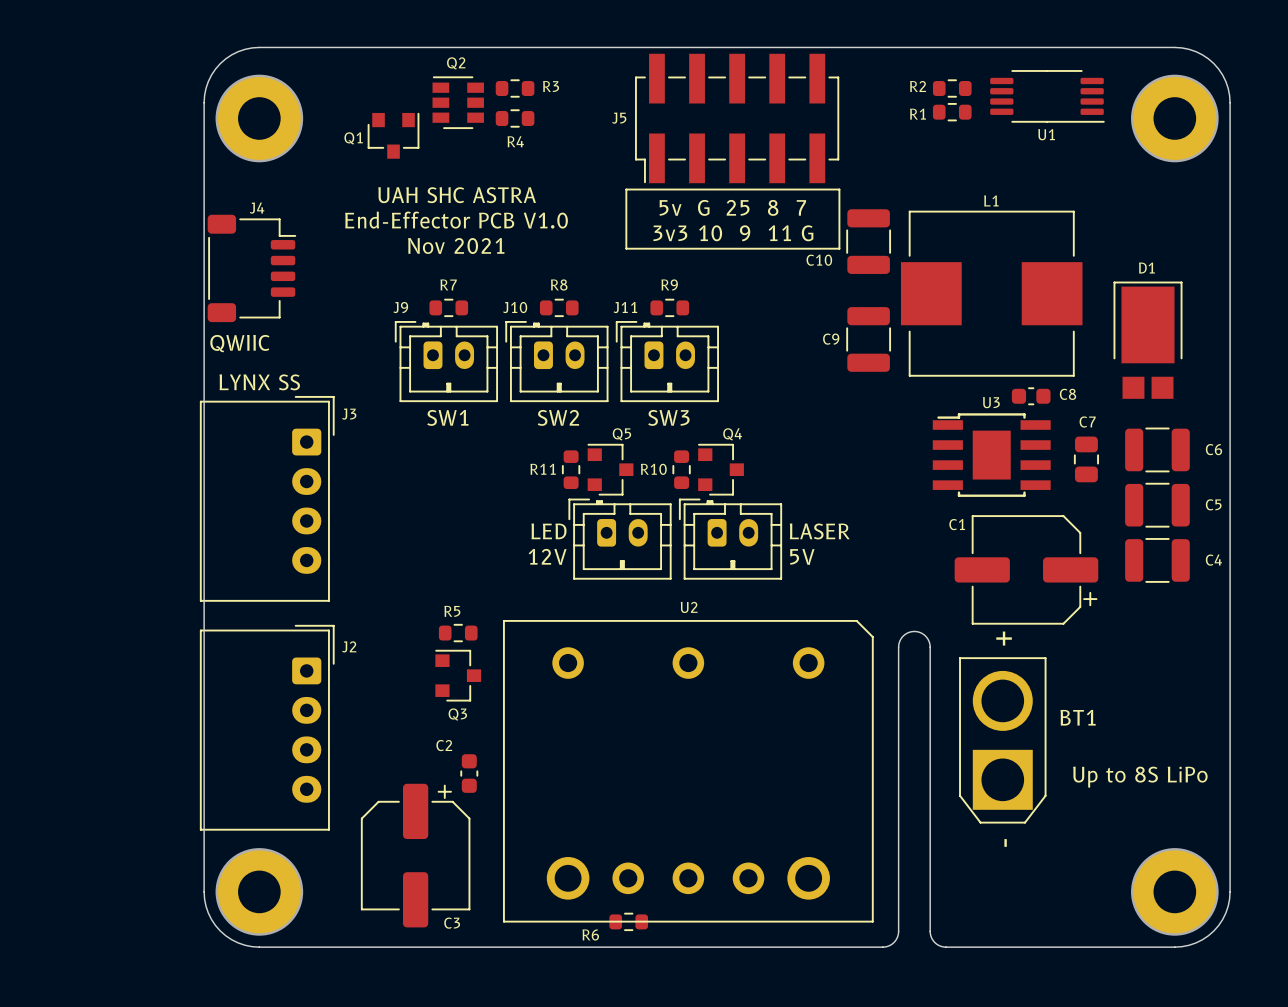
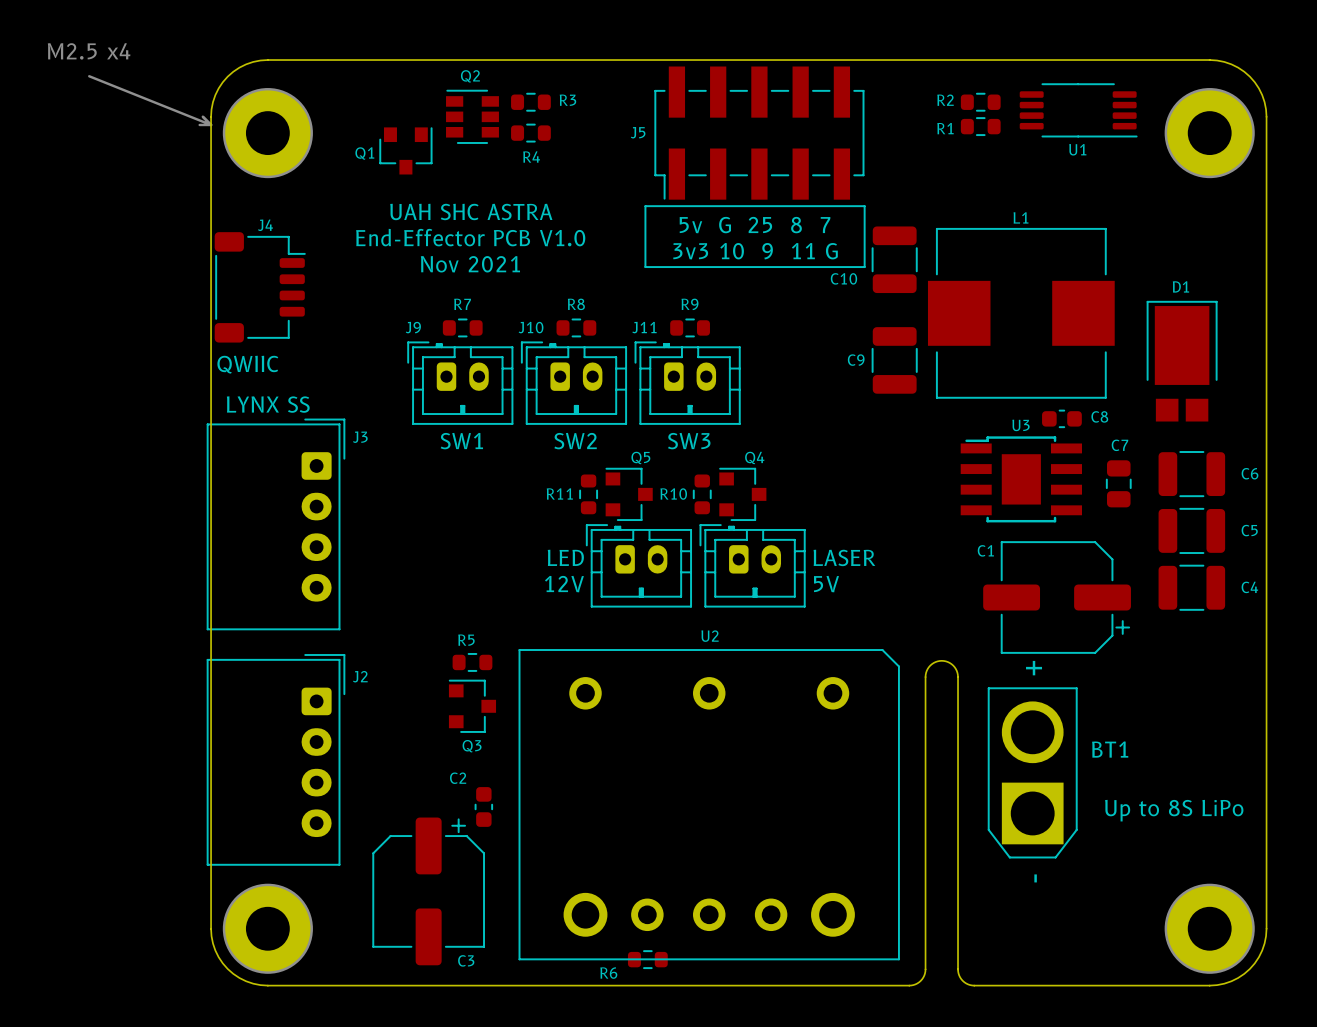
text: none -> M2.5 x4 (89, 51)
line: none -> (89, 76) (211, 124)
line: none -> (199, 124) (211, 124)

